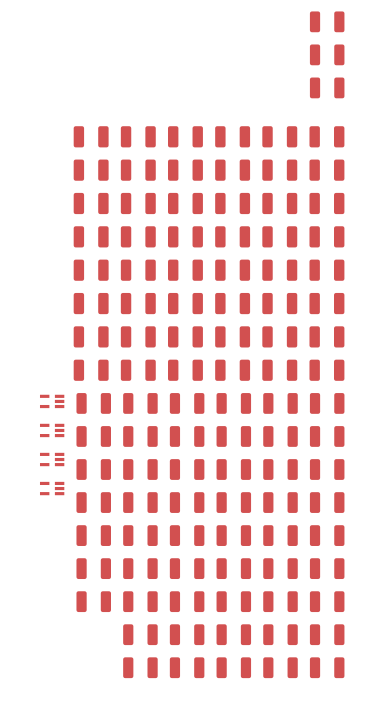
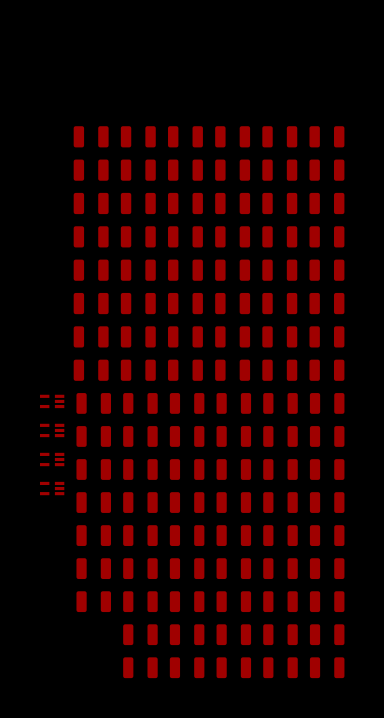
part: (327, 21) -> none
part: (327, 54) -> none
part: (327, 87) -> none

